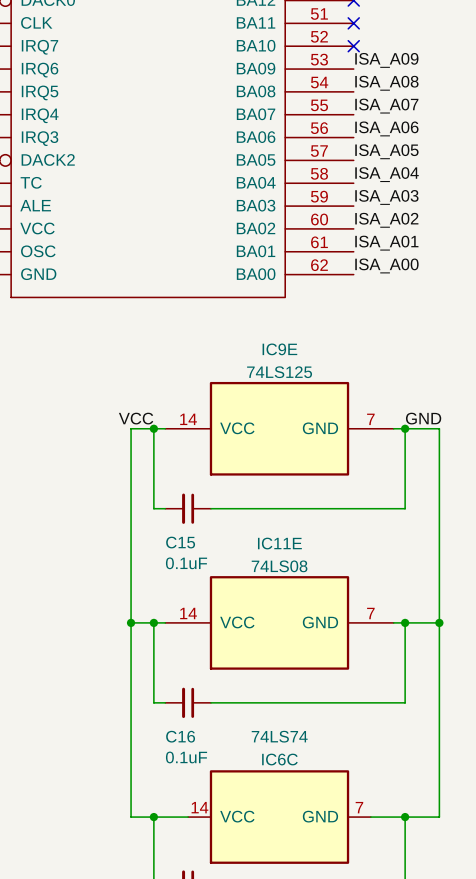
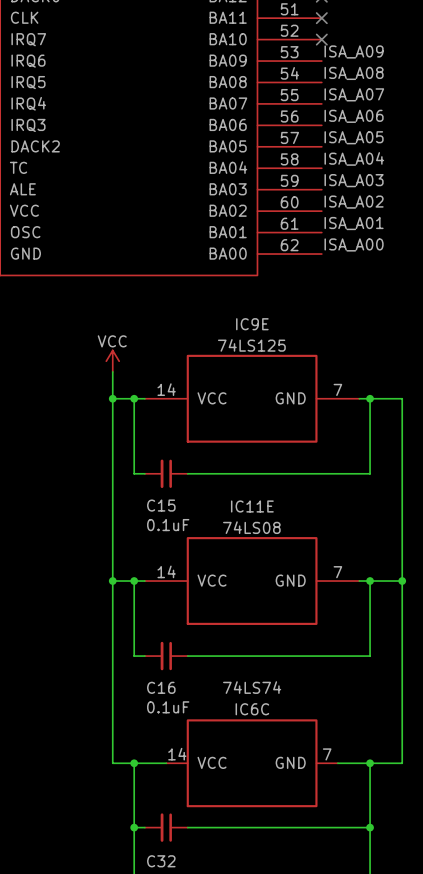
power symbol: none -> VCC (112, 361)
wire: none -> (112, 371) (112, 398)
label: VCC (136, 418) -> none
label: GND (423, 418) -> none
junction: none -> (112, 398)

